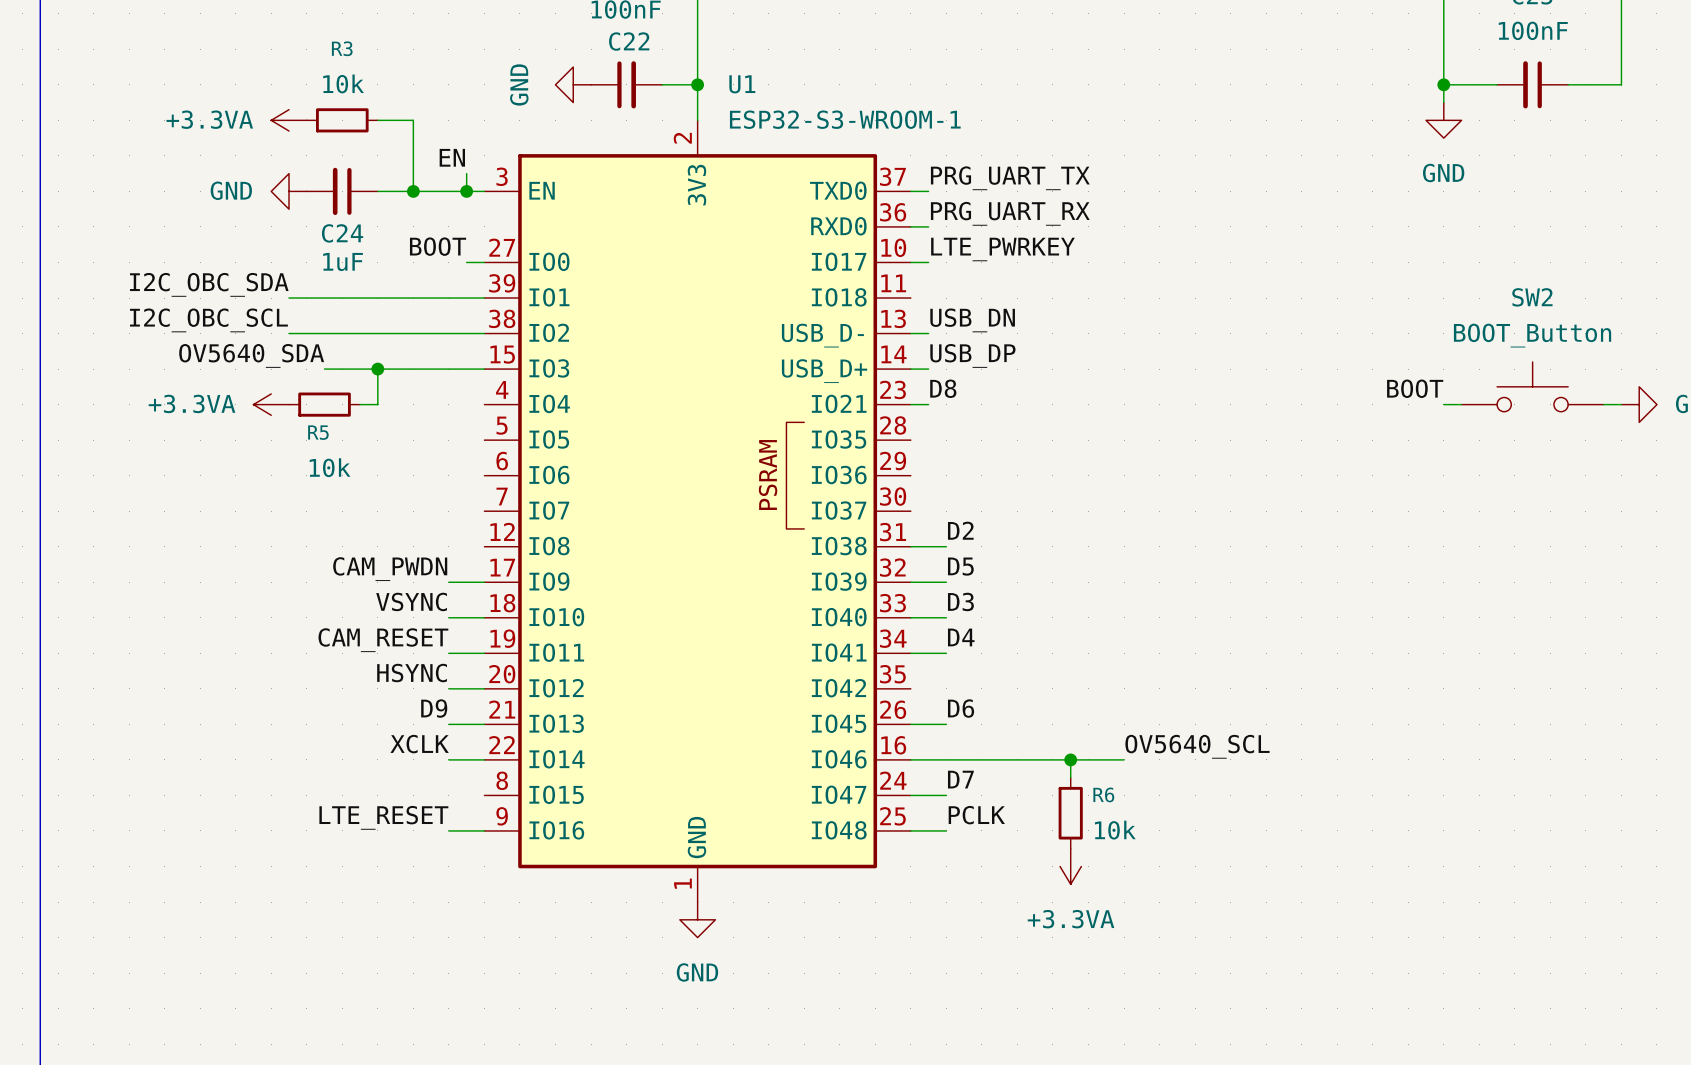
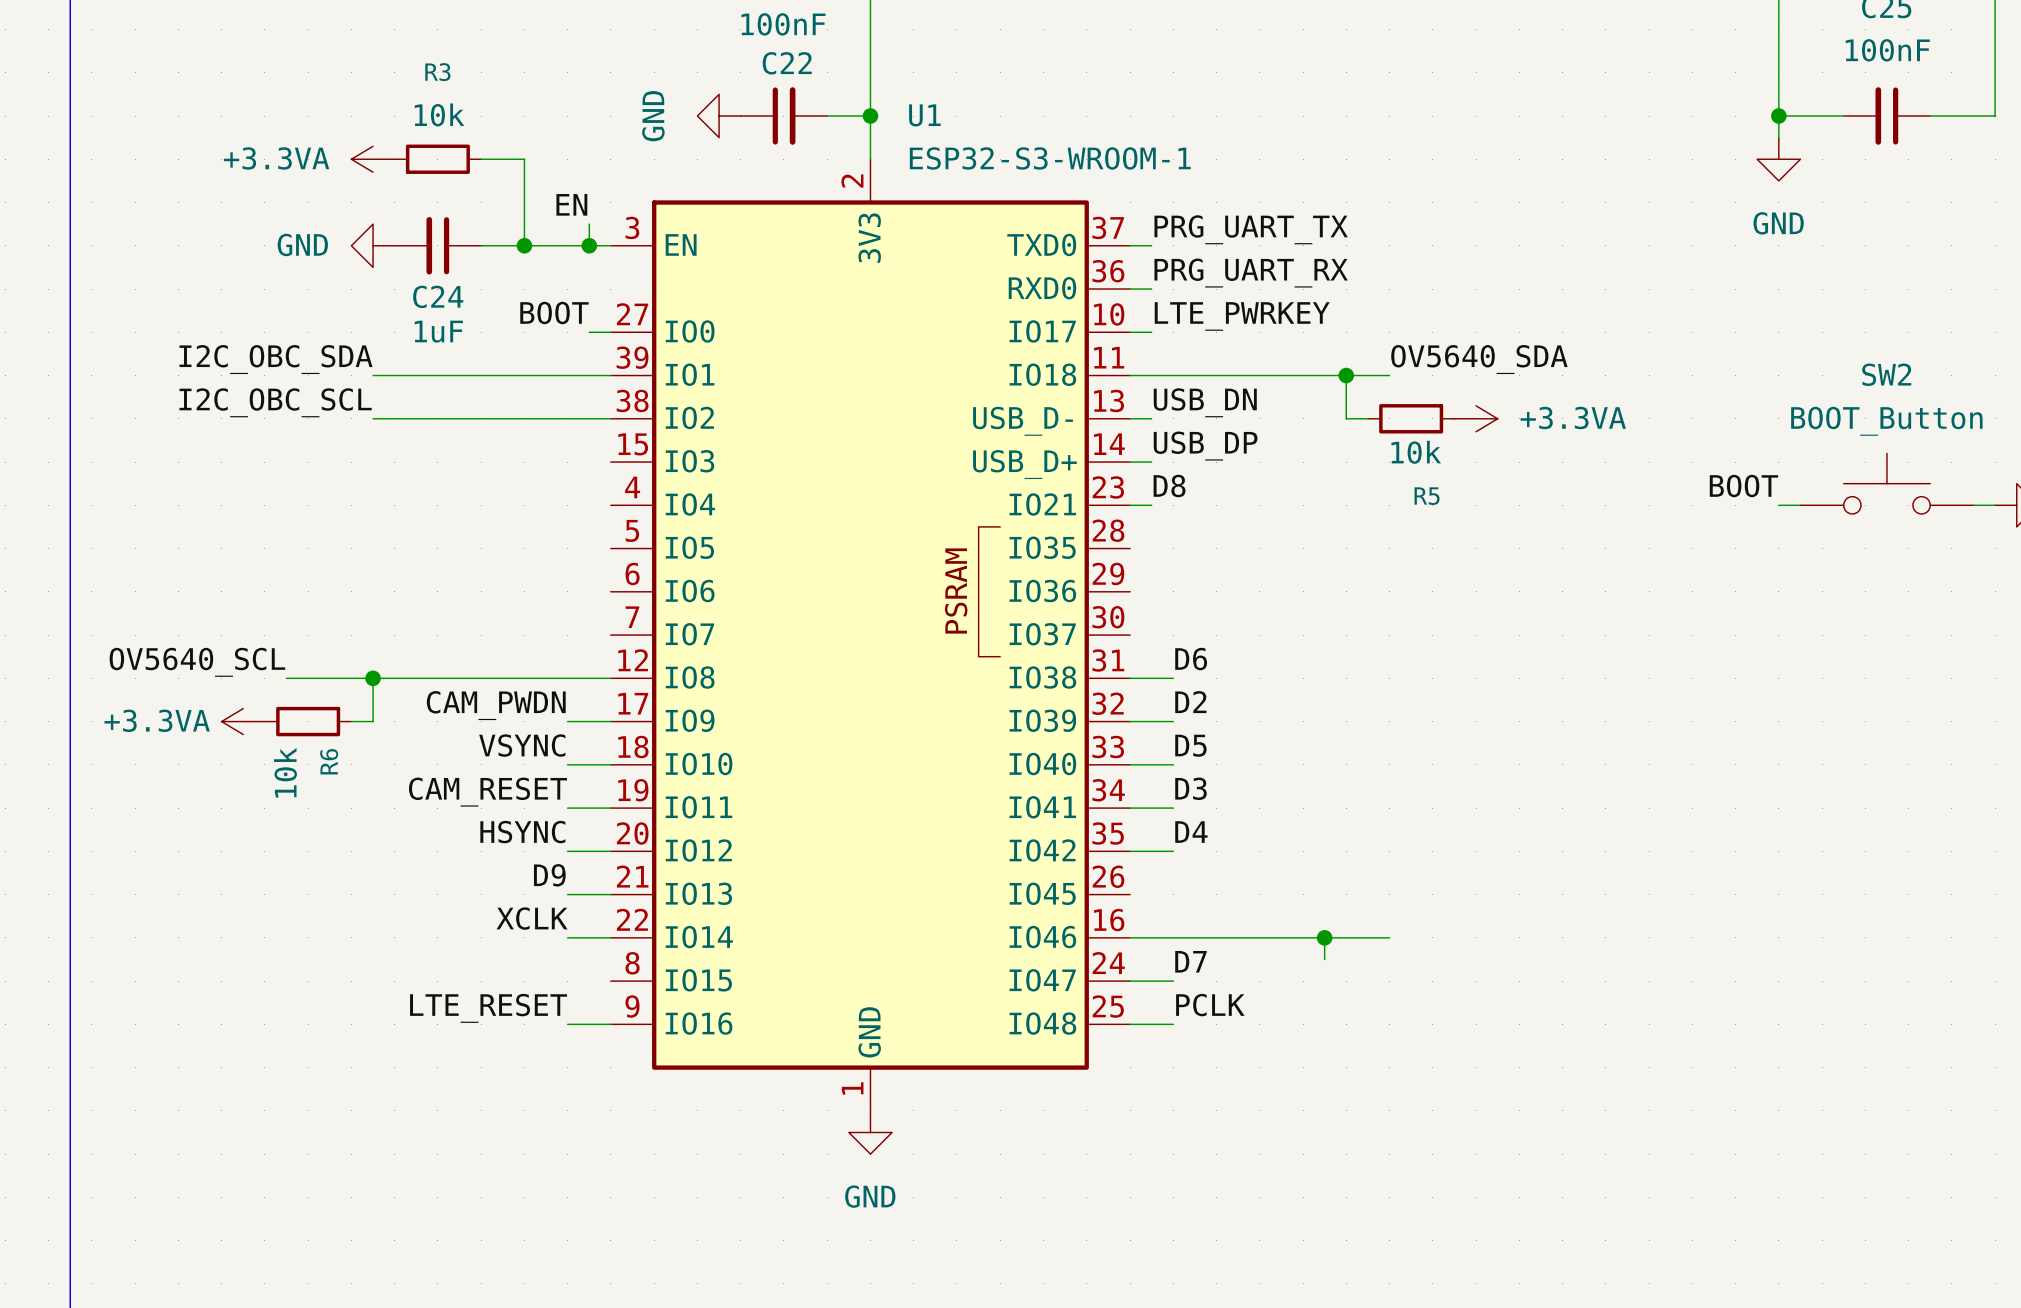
label: none -> OV5640_SDA (1479, 359)
wire: none -> (1130, 375) (1389, 375)
wire: none -> (1346, 375) (1346, 418) (1367, 418)
junction: none -> (1346, 375)
power symbol: none -> +3.3VA (1476, 418)
label: OV5640_SDA (251, 355) -> none
wire: (324, 369) (484, 369) -> none
wire: (377, 369) (377, 404) (360, 404) -> (373, 678) (373, 721) (351, 721)
junction: (377, 369) -> none
power symbol text position: +3.3VA (191, 403) -> +3.3VA (157, 720)
power symbol position: +3.3VA (271, 404) -> +3.3VA (243, 721)
R5 position: (324, 404) -> (1411, 418)
R5 name position: R5 (318, 432) -> R5 (1427, 496)
R5 value position: 10k (330, 467) -> 10k (1416, 452)
label: D2 (960, 530) -> D6 (1191, 659)
label: none -> OV5640_SCL (197, 662)
wire: none -> (286, 678) (610, 678)
junction: none -> (373, 678)
label: D5 (960, 566) -> D2 (1190, 702)
label: D3 (960, 601) -> D5 (1190, 745)
label: D4 (961, 637) -> D3 (1190, 788)
label: none -> D4 (1191, 832)
label: D6 (961, 708) -> none
wire: (910, 724) (946, 724) -> (1130, 851) (1173, 851)
label: OV5640_SCL (1197, 746) -> none
R6 rotation: 0° (1070, 813) -> 90° clockwise (308, 721)
R6 position: (1070, 813) -> (308, 721)
power symbol: +3.3VA (1070, 866) -> none

